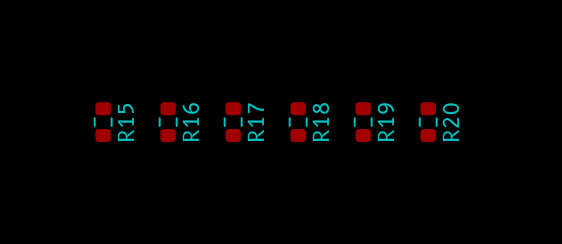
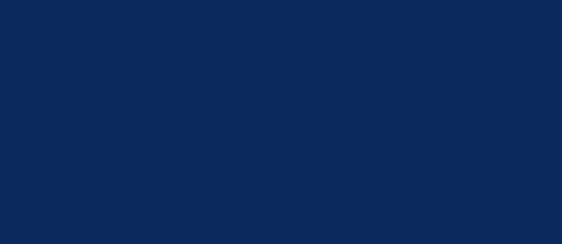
R15: (103, 122) -> none
R16: (168, 122) -> none
R17: (233, 122) -> none
R18: (298, 122) -> none
R19: (363, 122) -> none
R20: (428, 122) -> none

